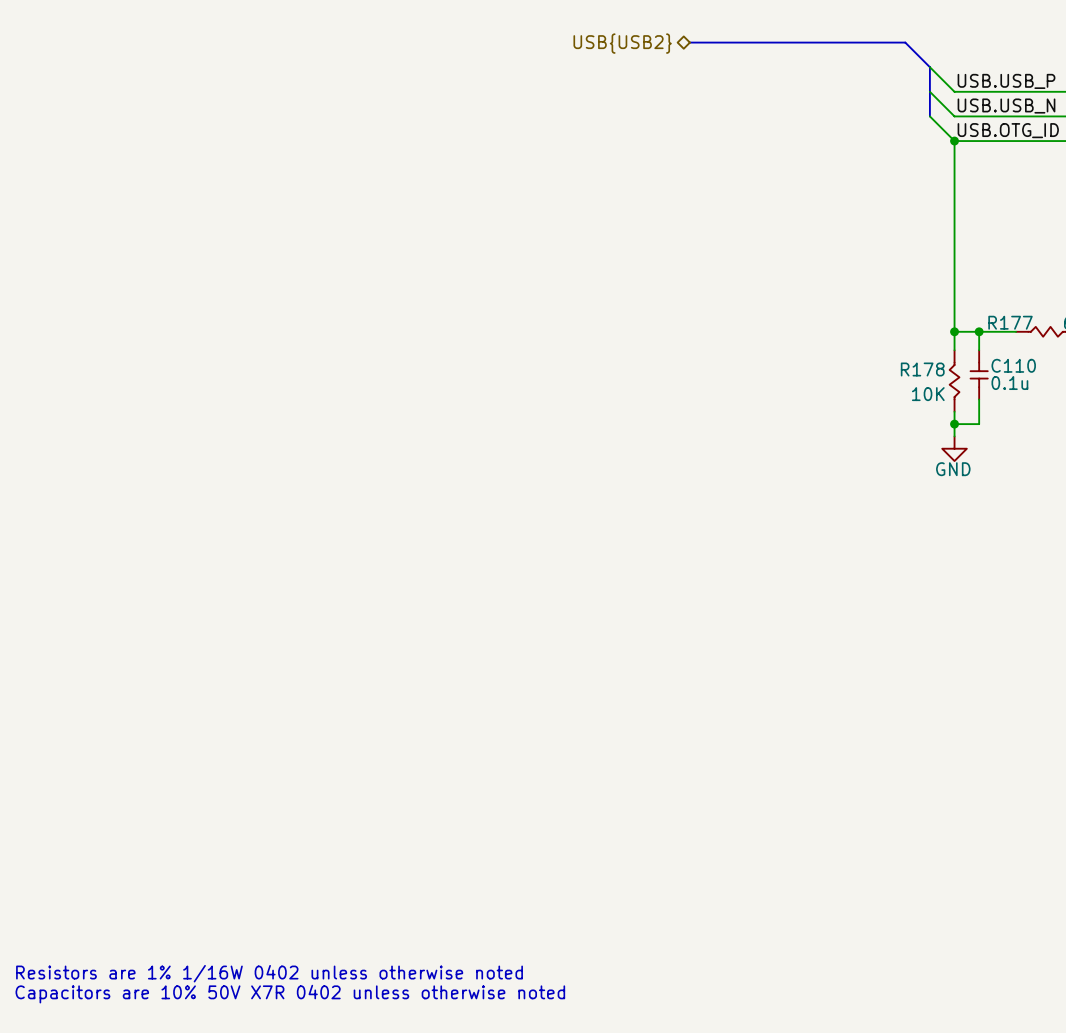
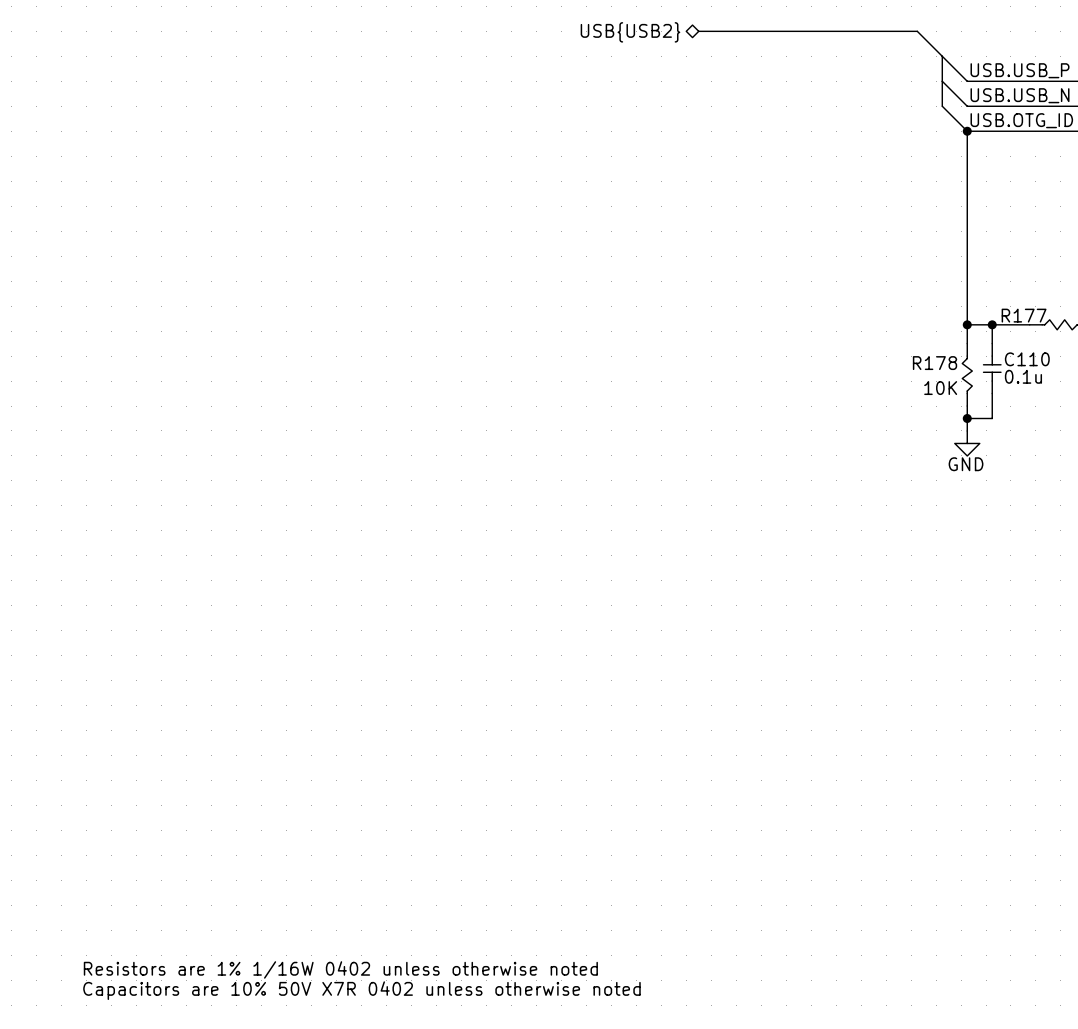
text position: Resistors are 1% 1/16W 0402 unless otherwise noted (269, 973) -> Resistors are 1% 1/16W 0402 unless otherwise noted (340, 969)
text position: Capacitors are 10% 50V X7R 0402 unless otherwise noted (290, 994) -> Capacitors are 10% 50V X7R 0402 unless otherwise noted (361, 990)

